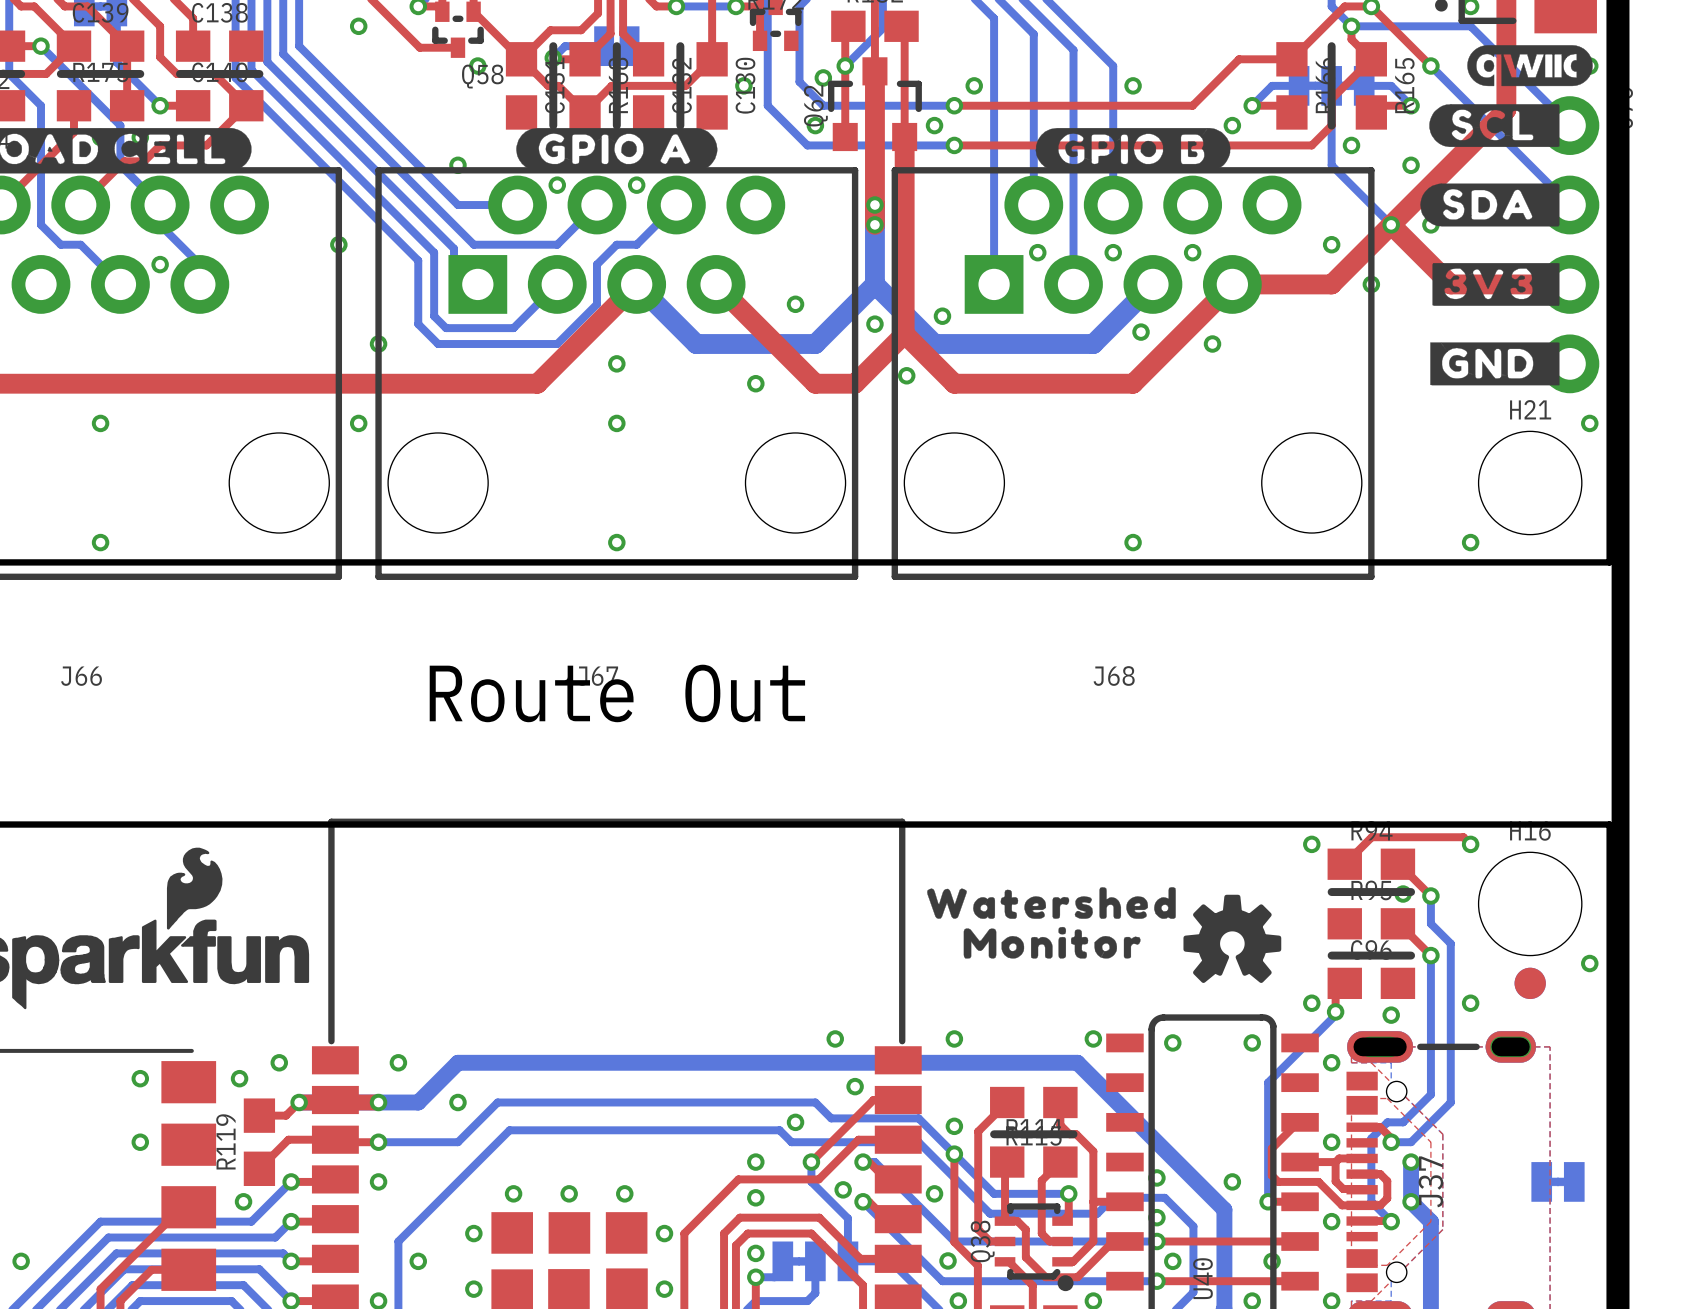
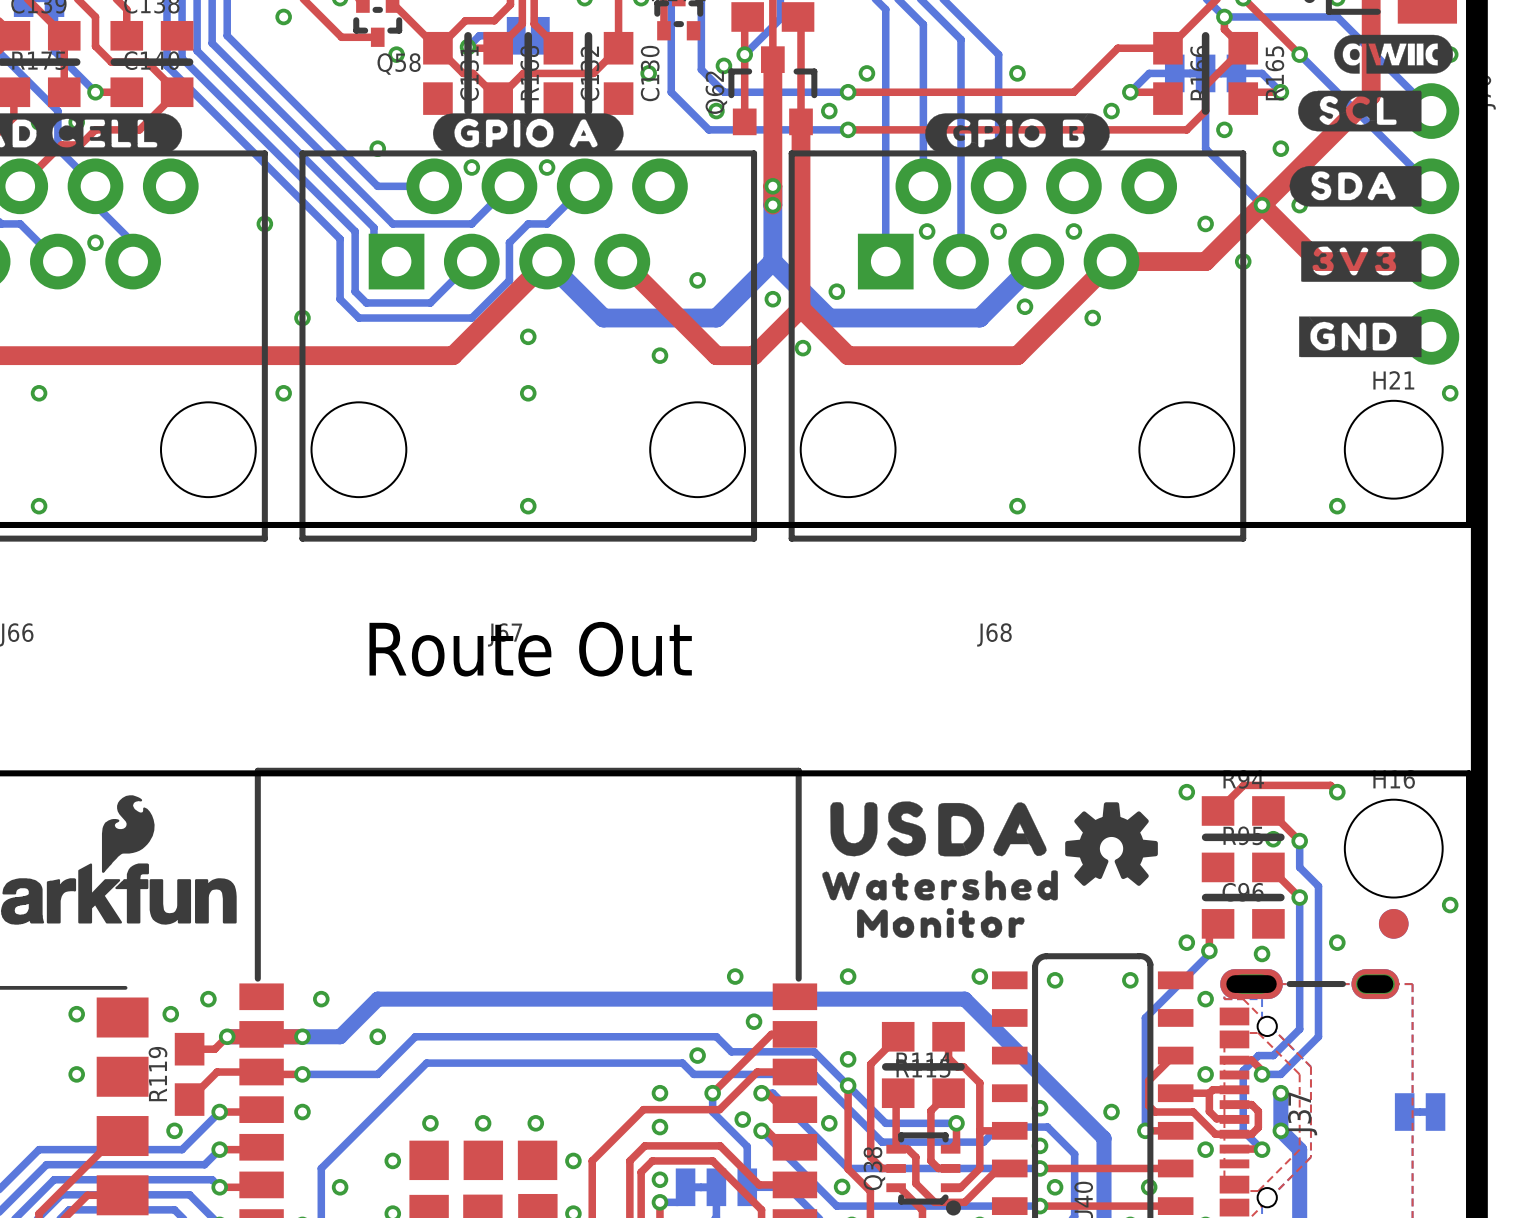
drawing: none -> [830, 801, 1047, 857]
drawing position: (1051, 903) -> (940, 885)
drawing position: (1232, 938) -> (1111, 844)
drawing position: (1052, 942) -> (940, 922)

